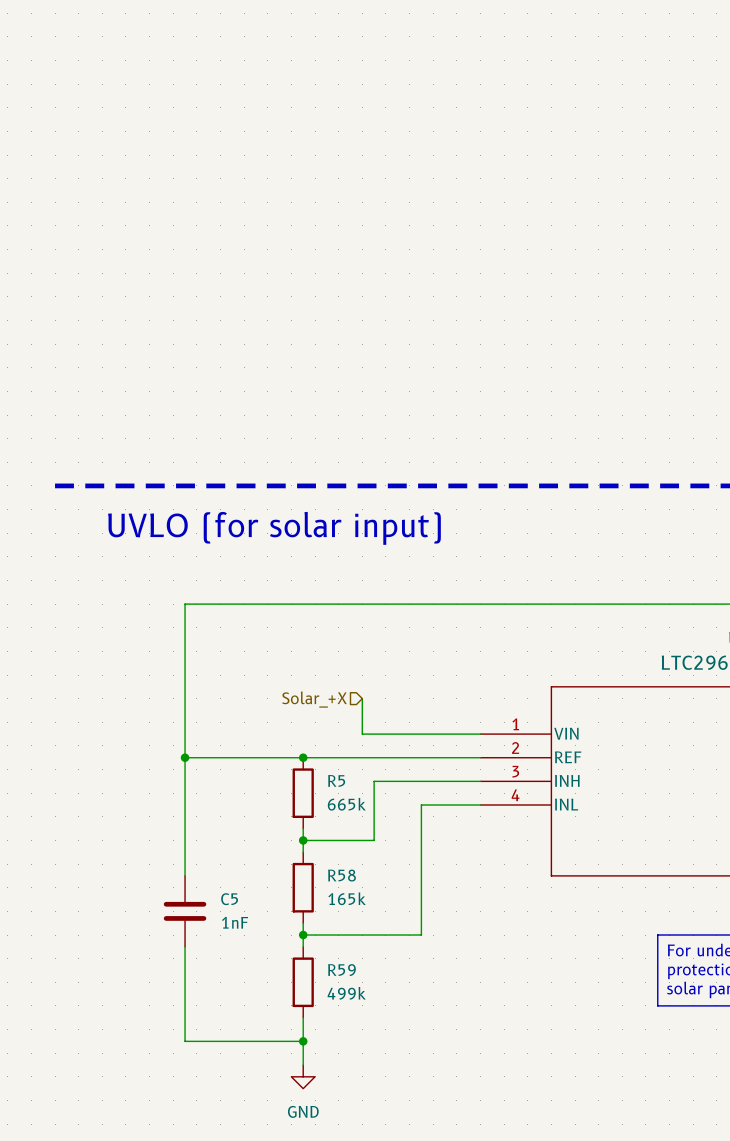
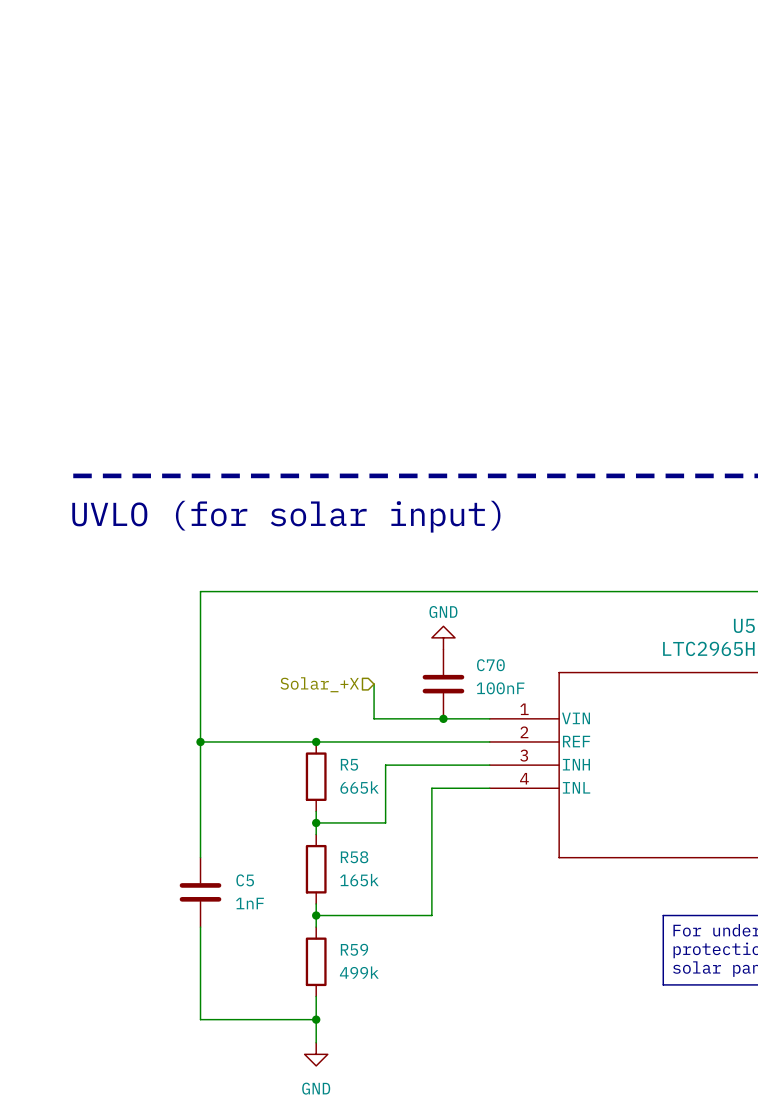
power symbol: none -> GND (443, 637)
C70: none -> 100nF (443, 684)
junction: none -> (443, 718)

